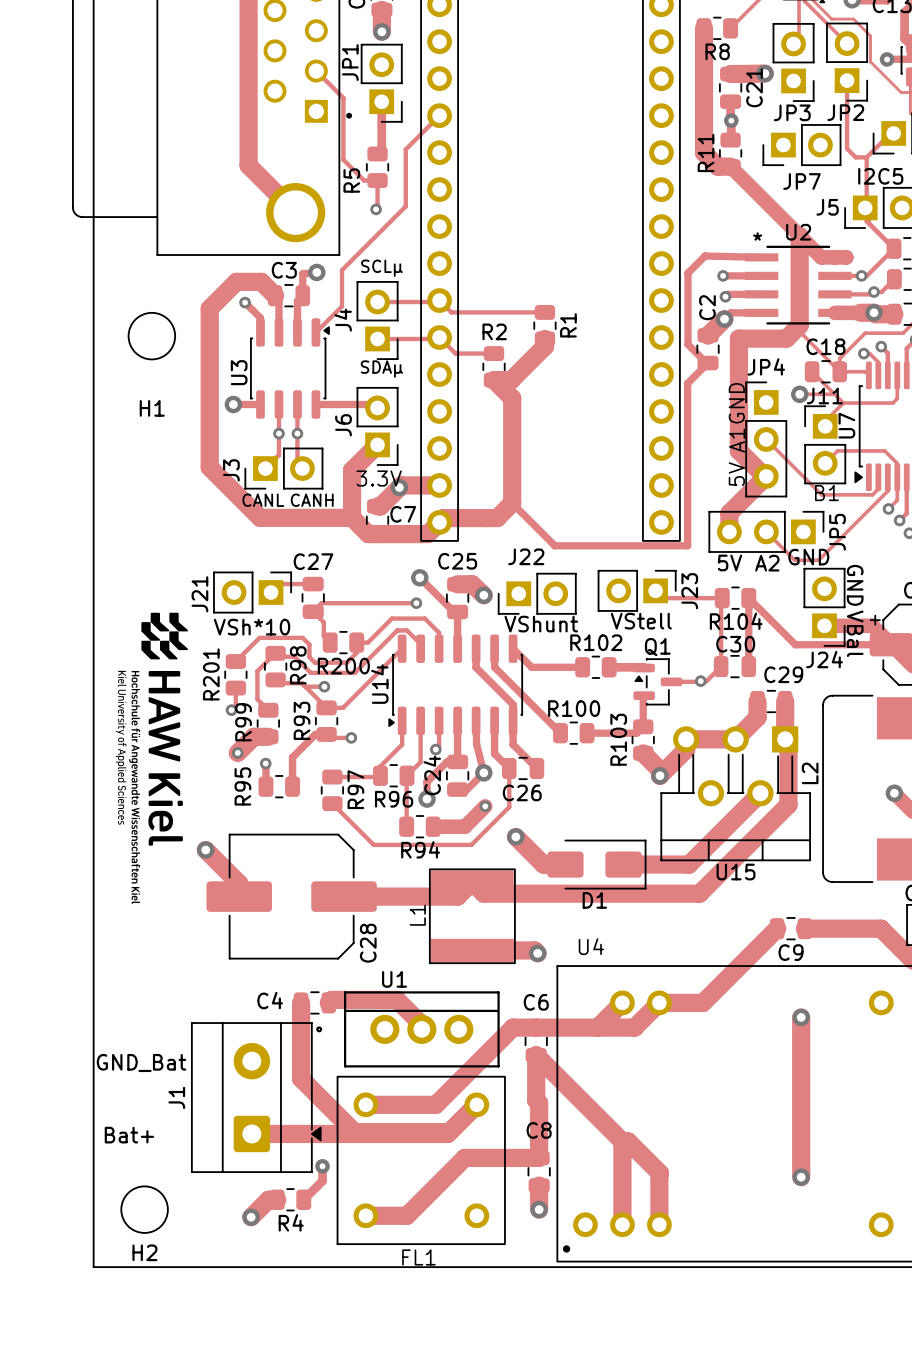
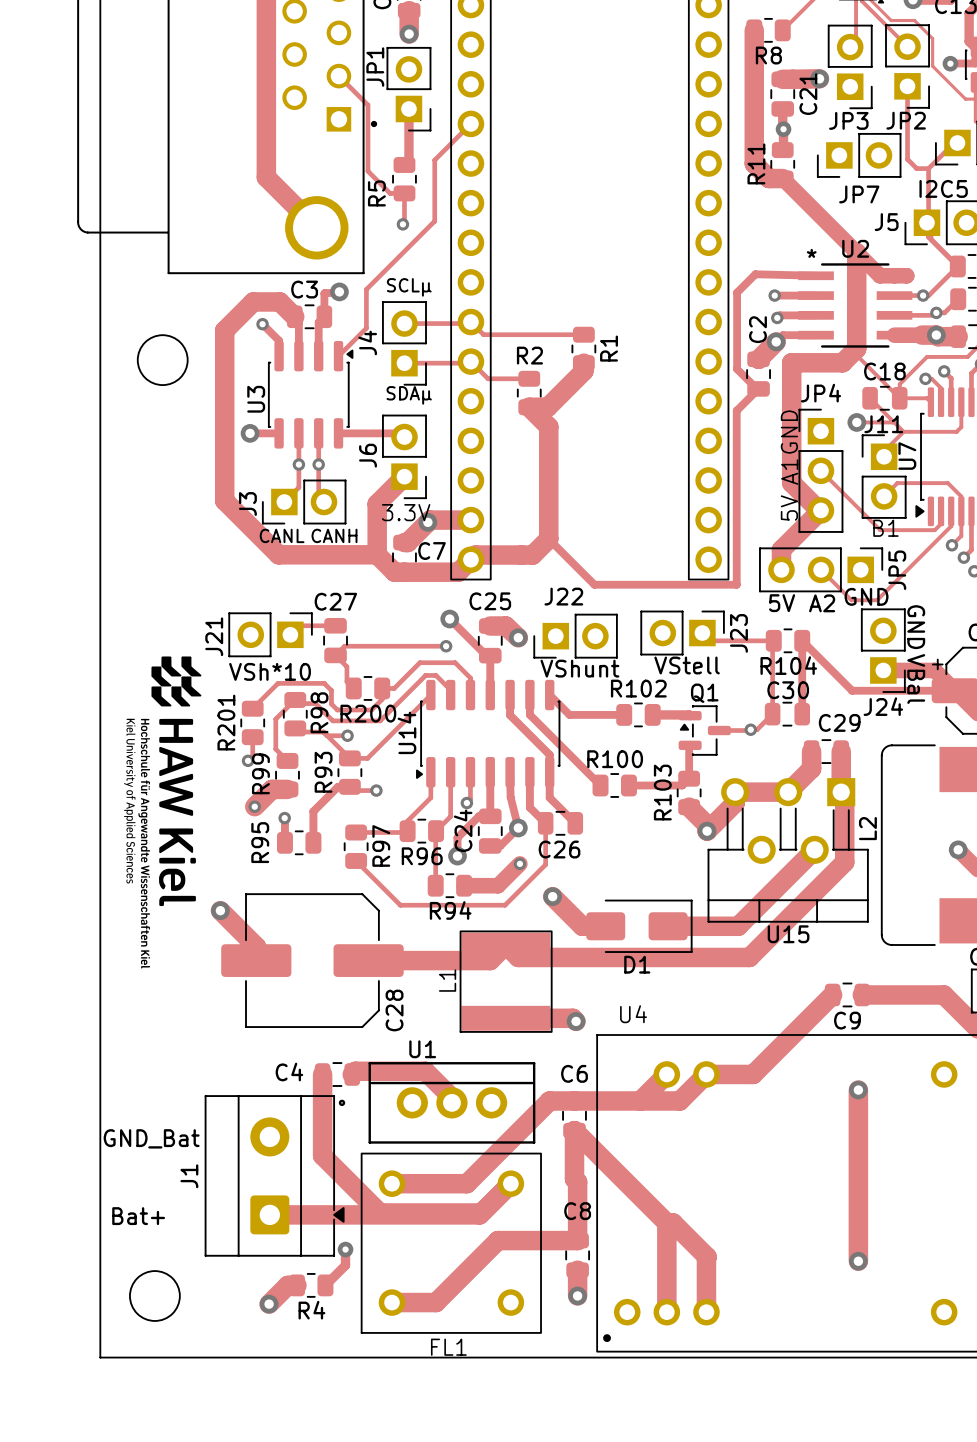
H1 name: H1 (152, 408) -> none
H2 name: H2 (144, 1252) -> none

